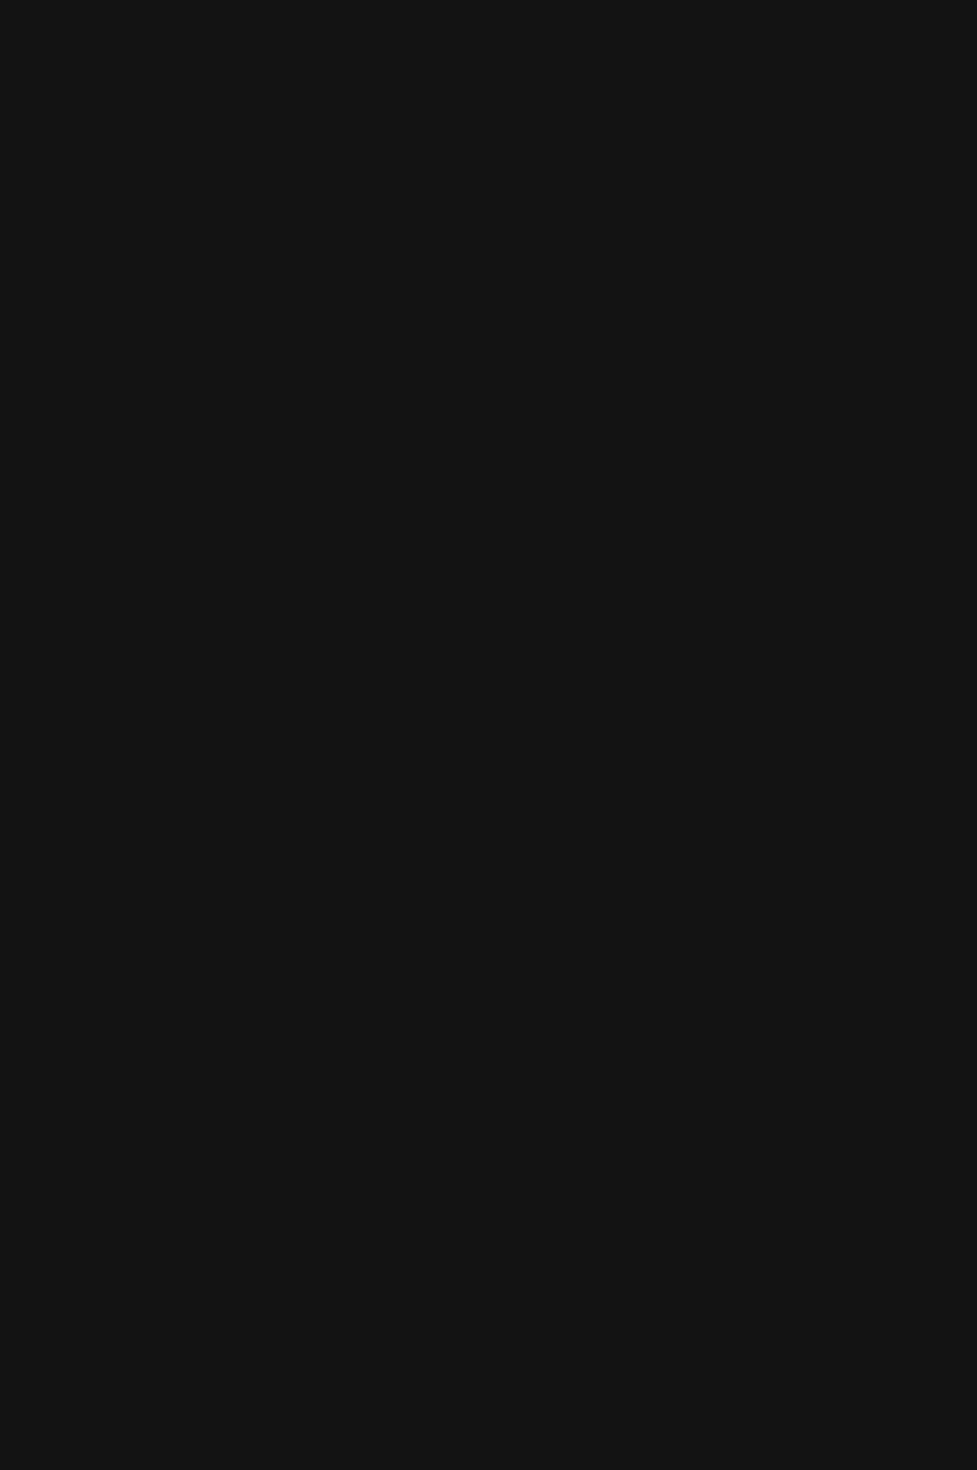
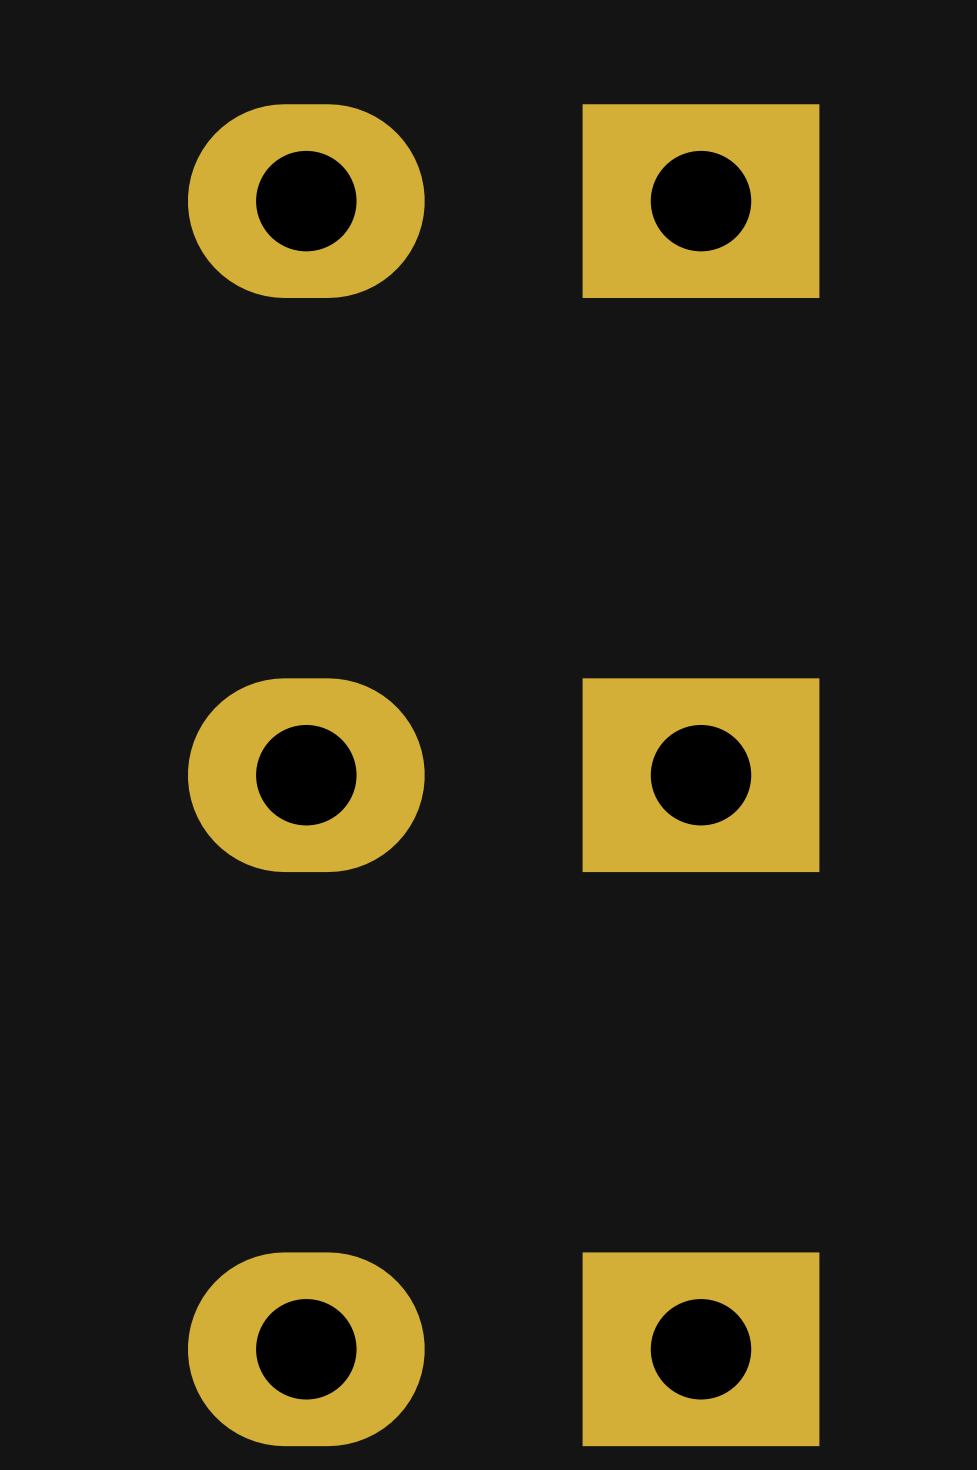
part: none -> (503, 201)
part: none -> (503, 775)
part: none -> (503, 1349)

